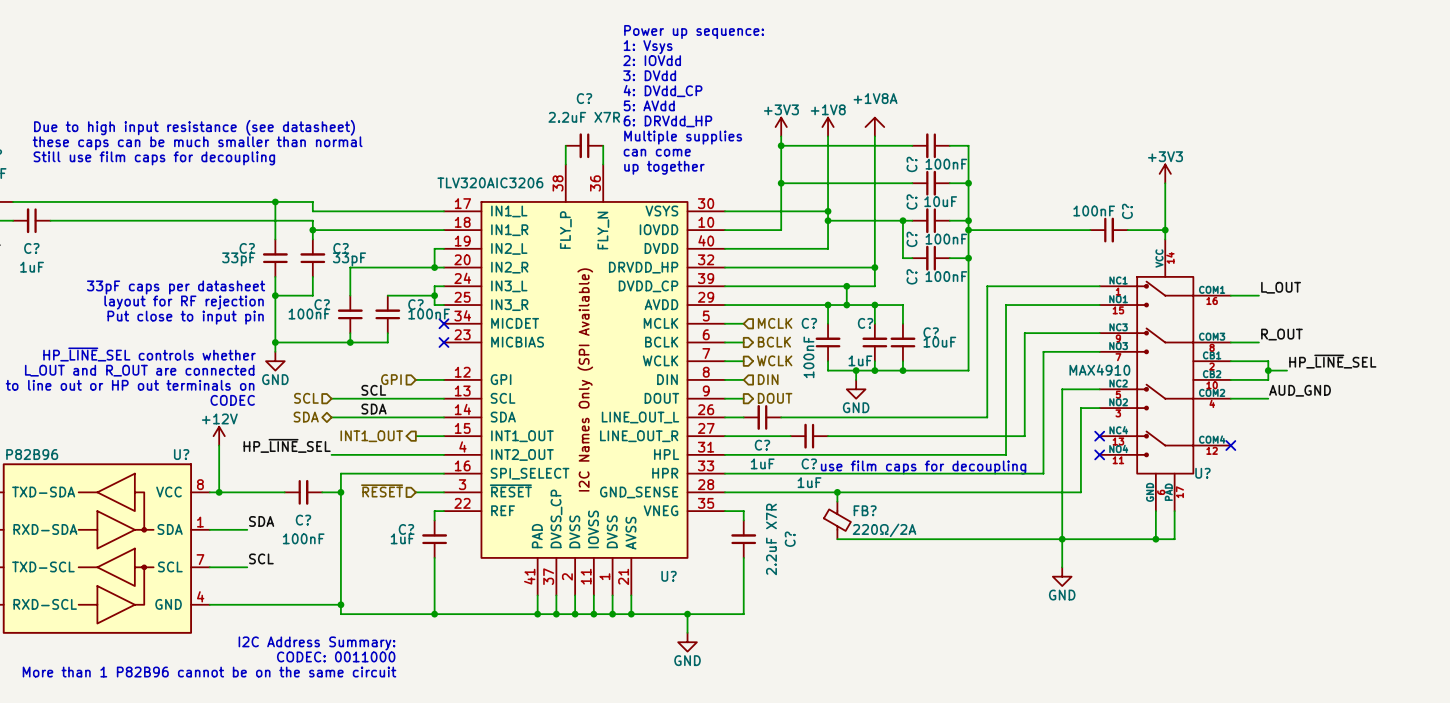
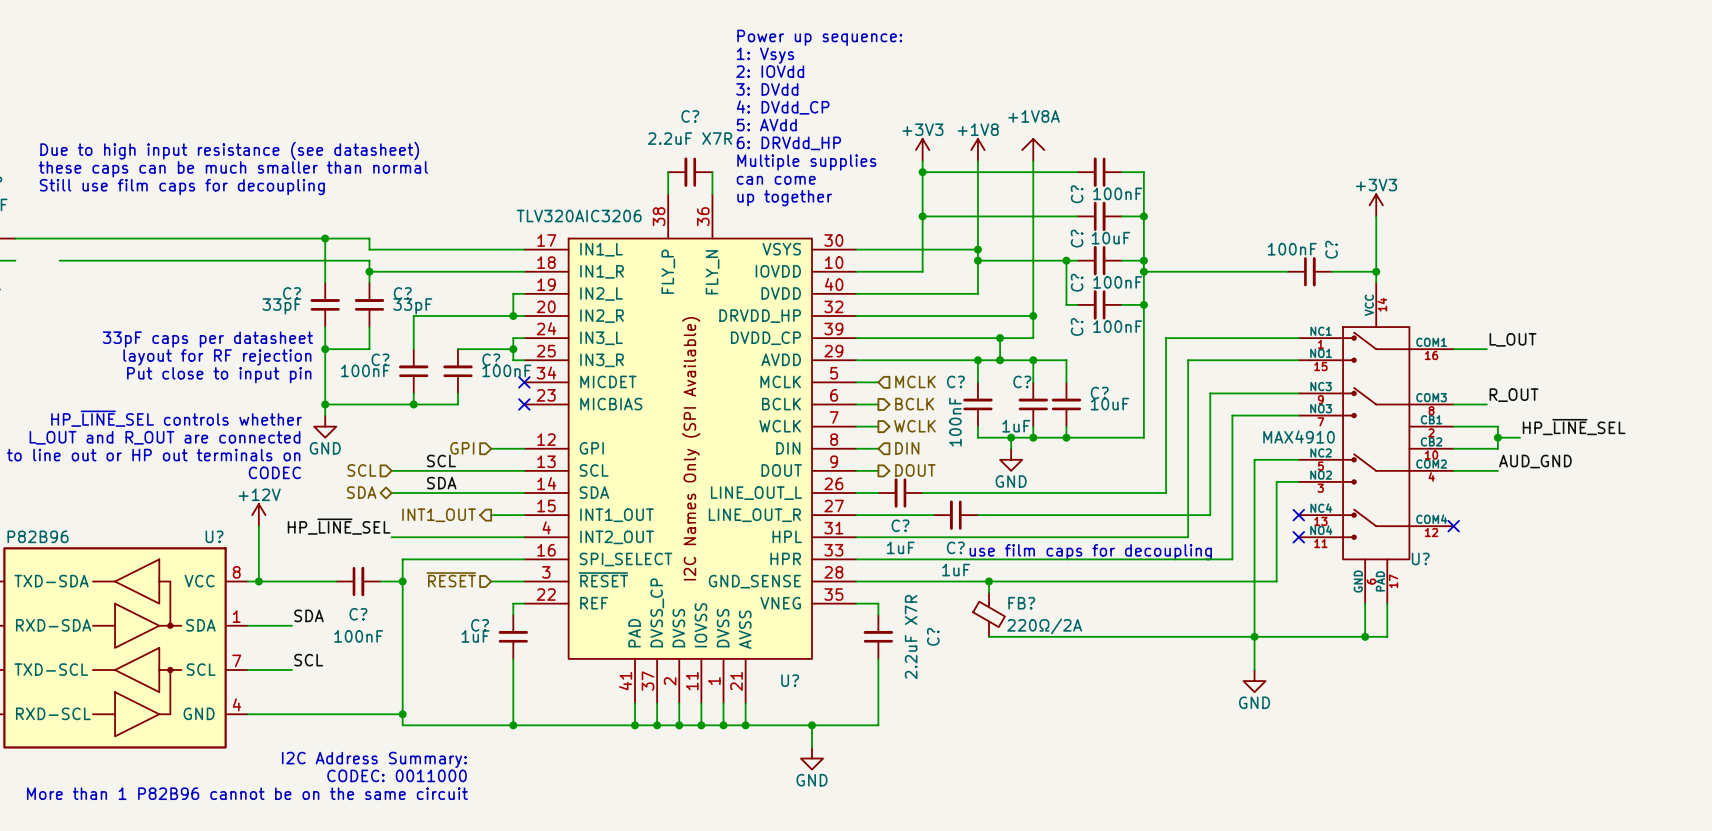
C?: 1uF (31, 220) -> none

